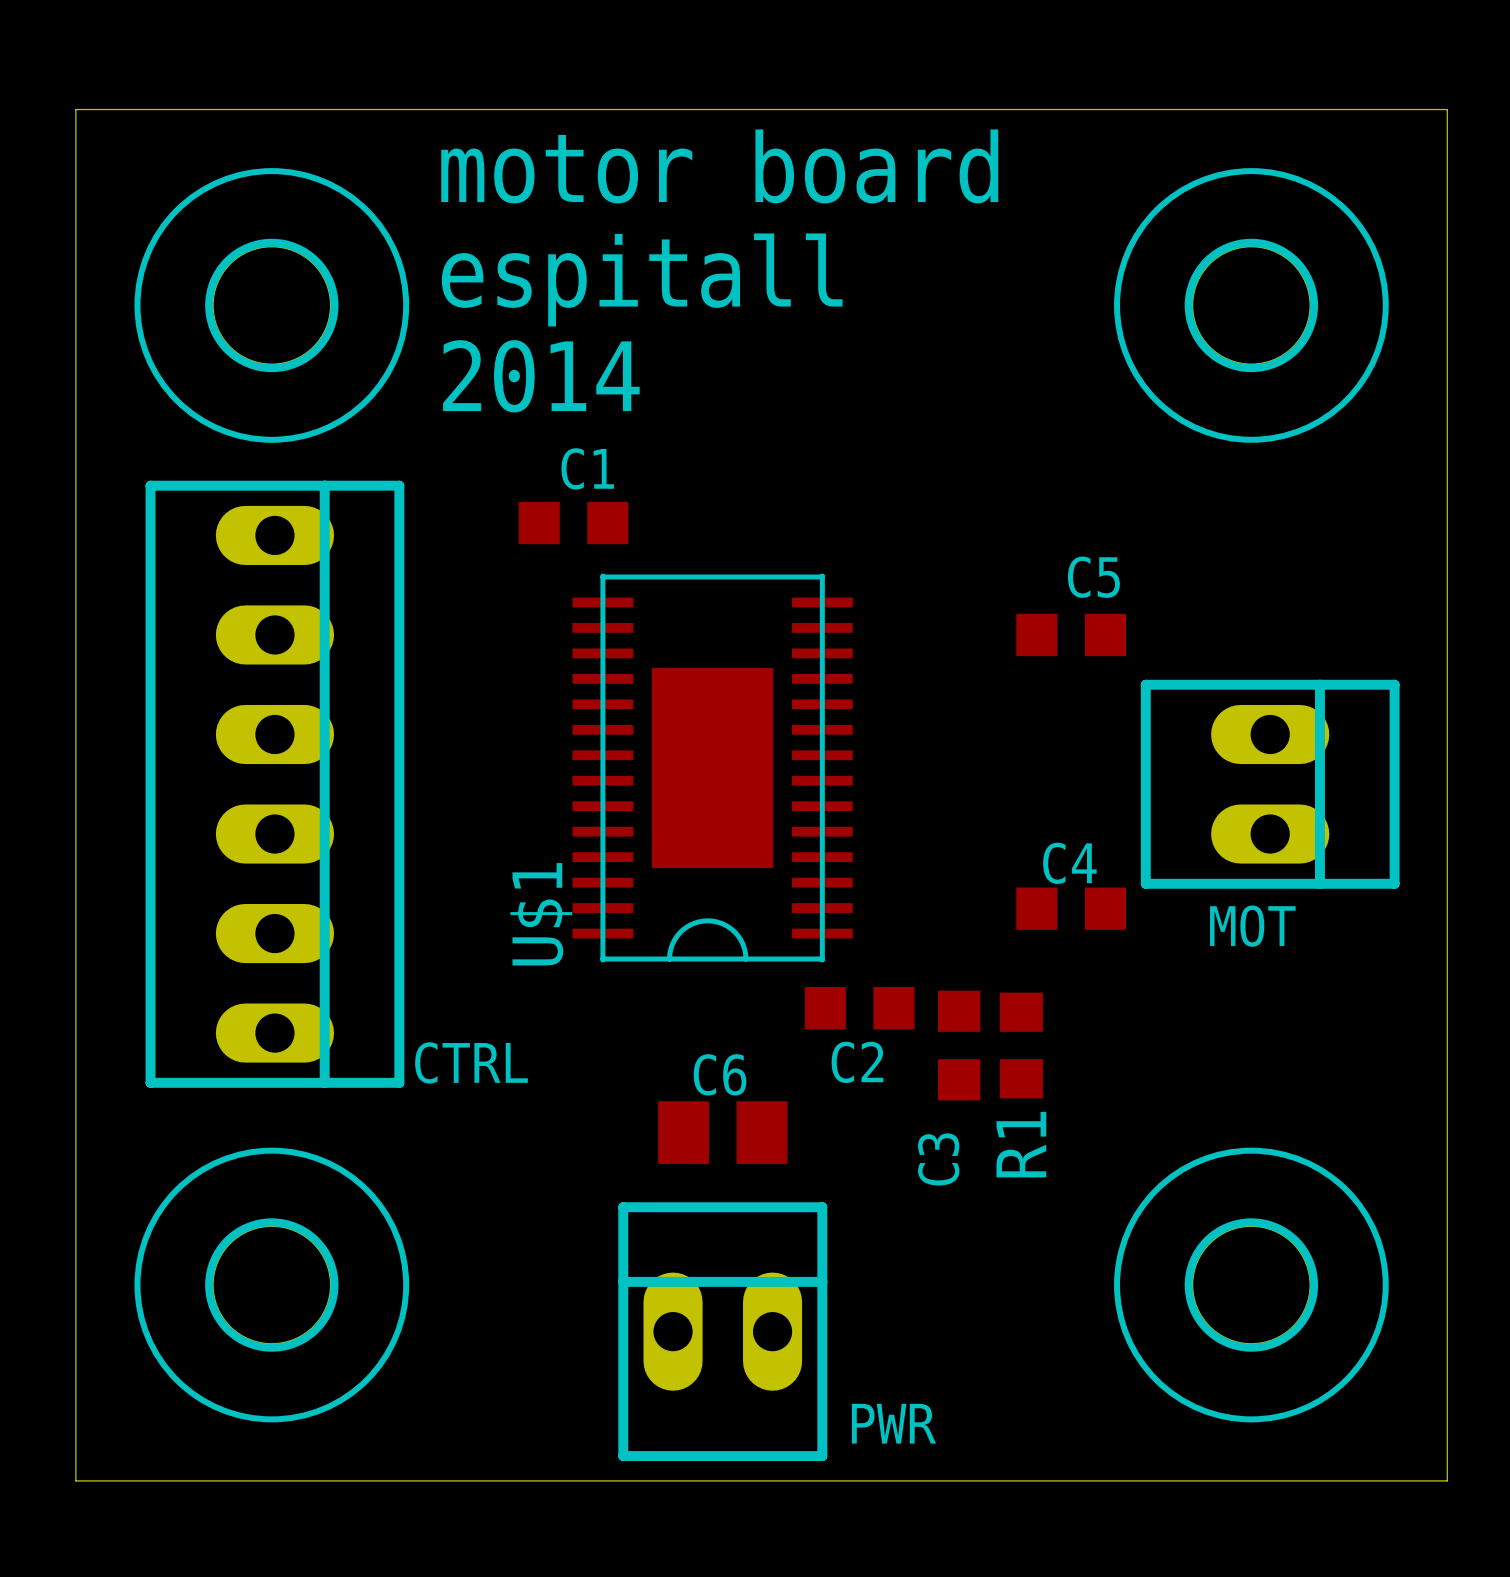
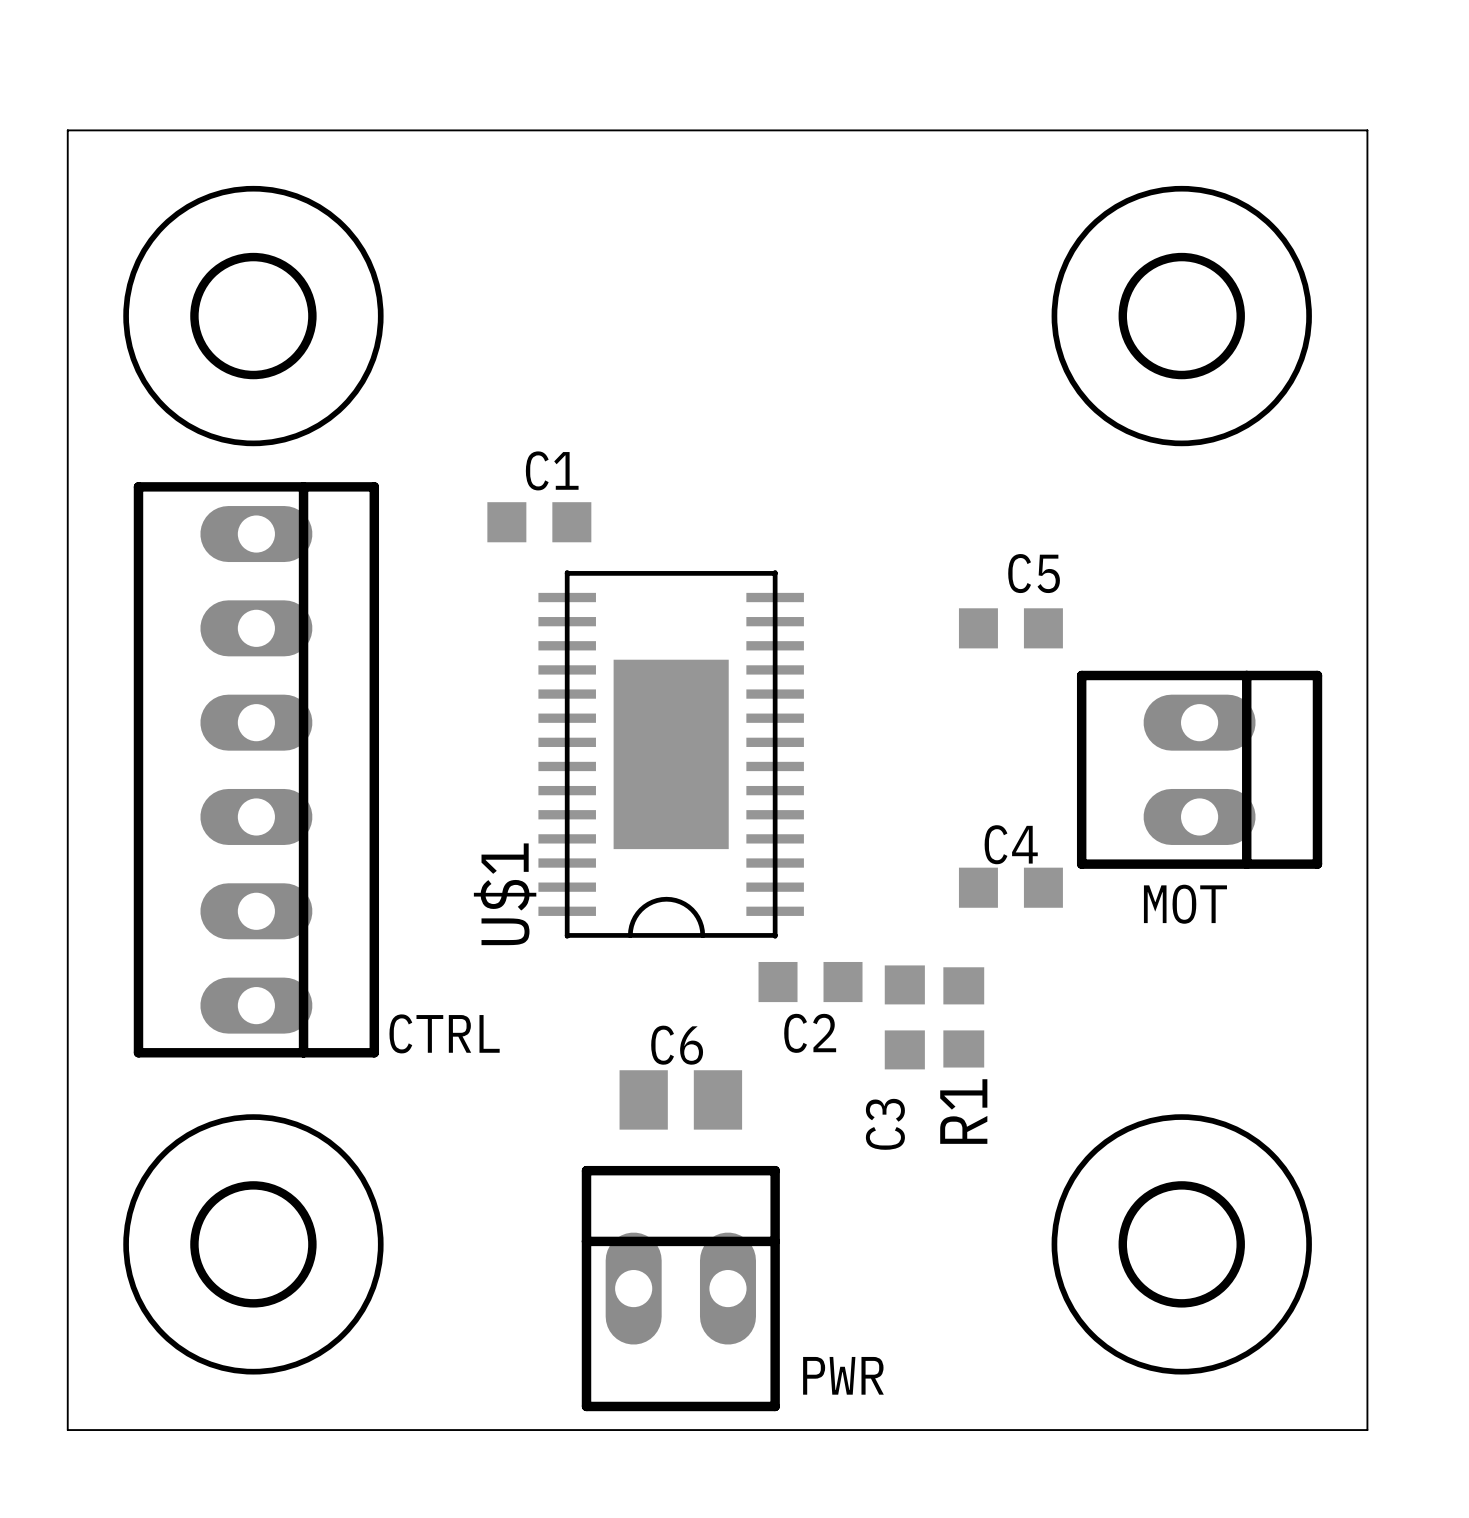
text: motor board (719, 166) -> none
text: espitall (642, 279) -> none
text: 2014 (541, 376) -> none

